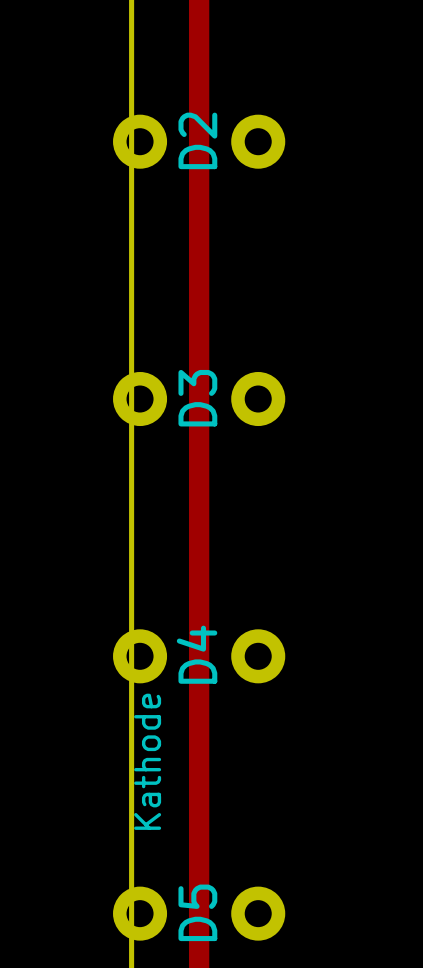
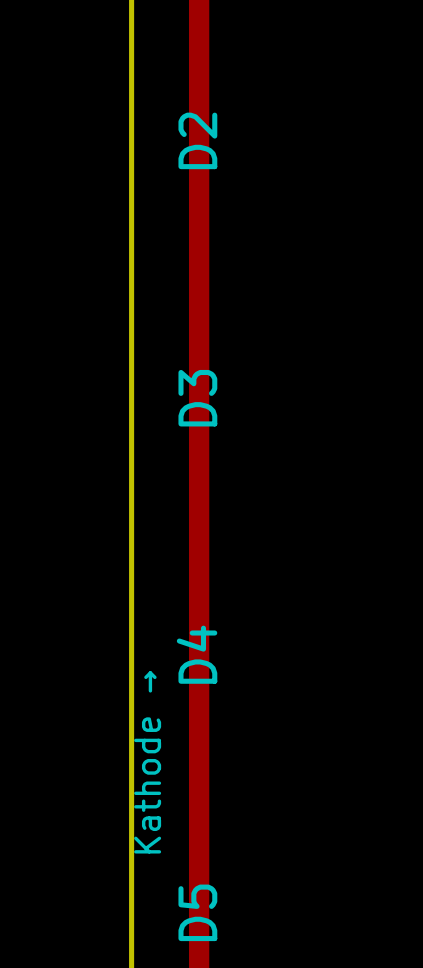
D2 footprint: [113, 114, 286, 169] -> [178, 112, 218, 170]
D3 footprint: [113, 371, 286, 427] -> [178, 369, 218, 427]
D4 footprint: [113, 629, 286, 684] -> [176, 625, 218, 684]
text: Kathode (147, 761) -> Kathode → (147, 762)
D5 footprint: [113, 886, 286, 941] -> [178, 884, 218, 942]

